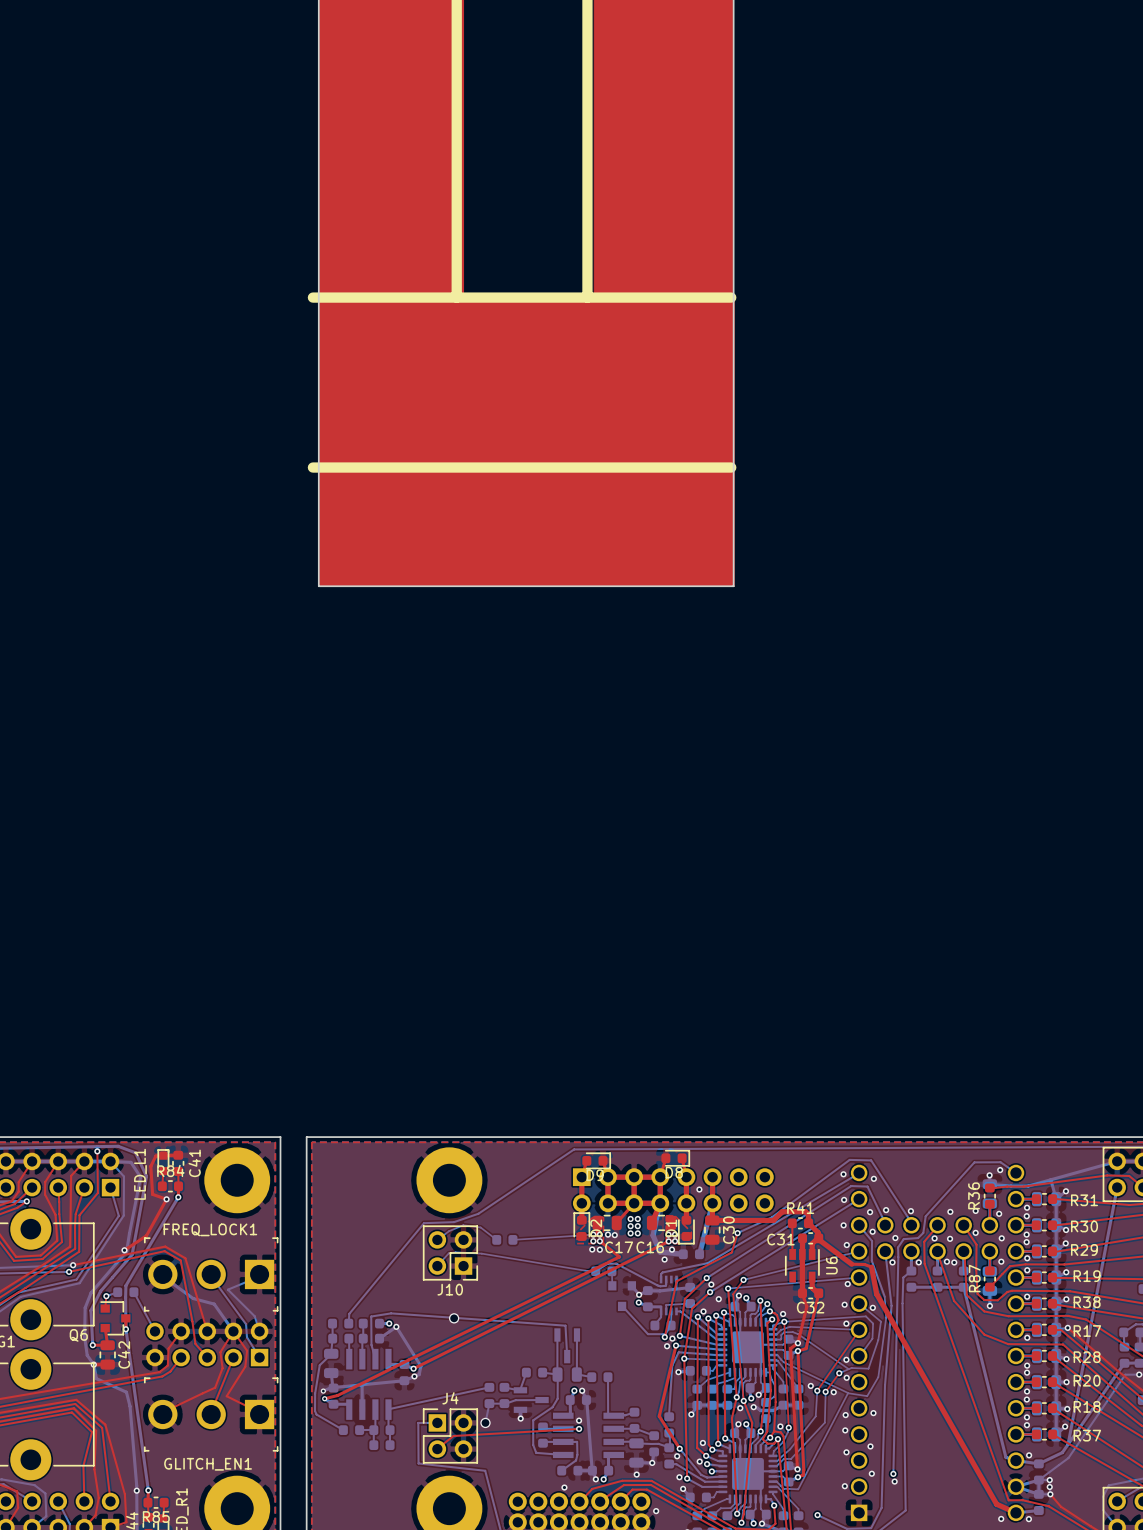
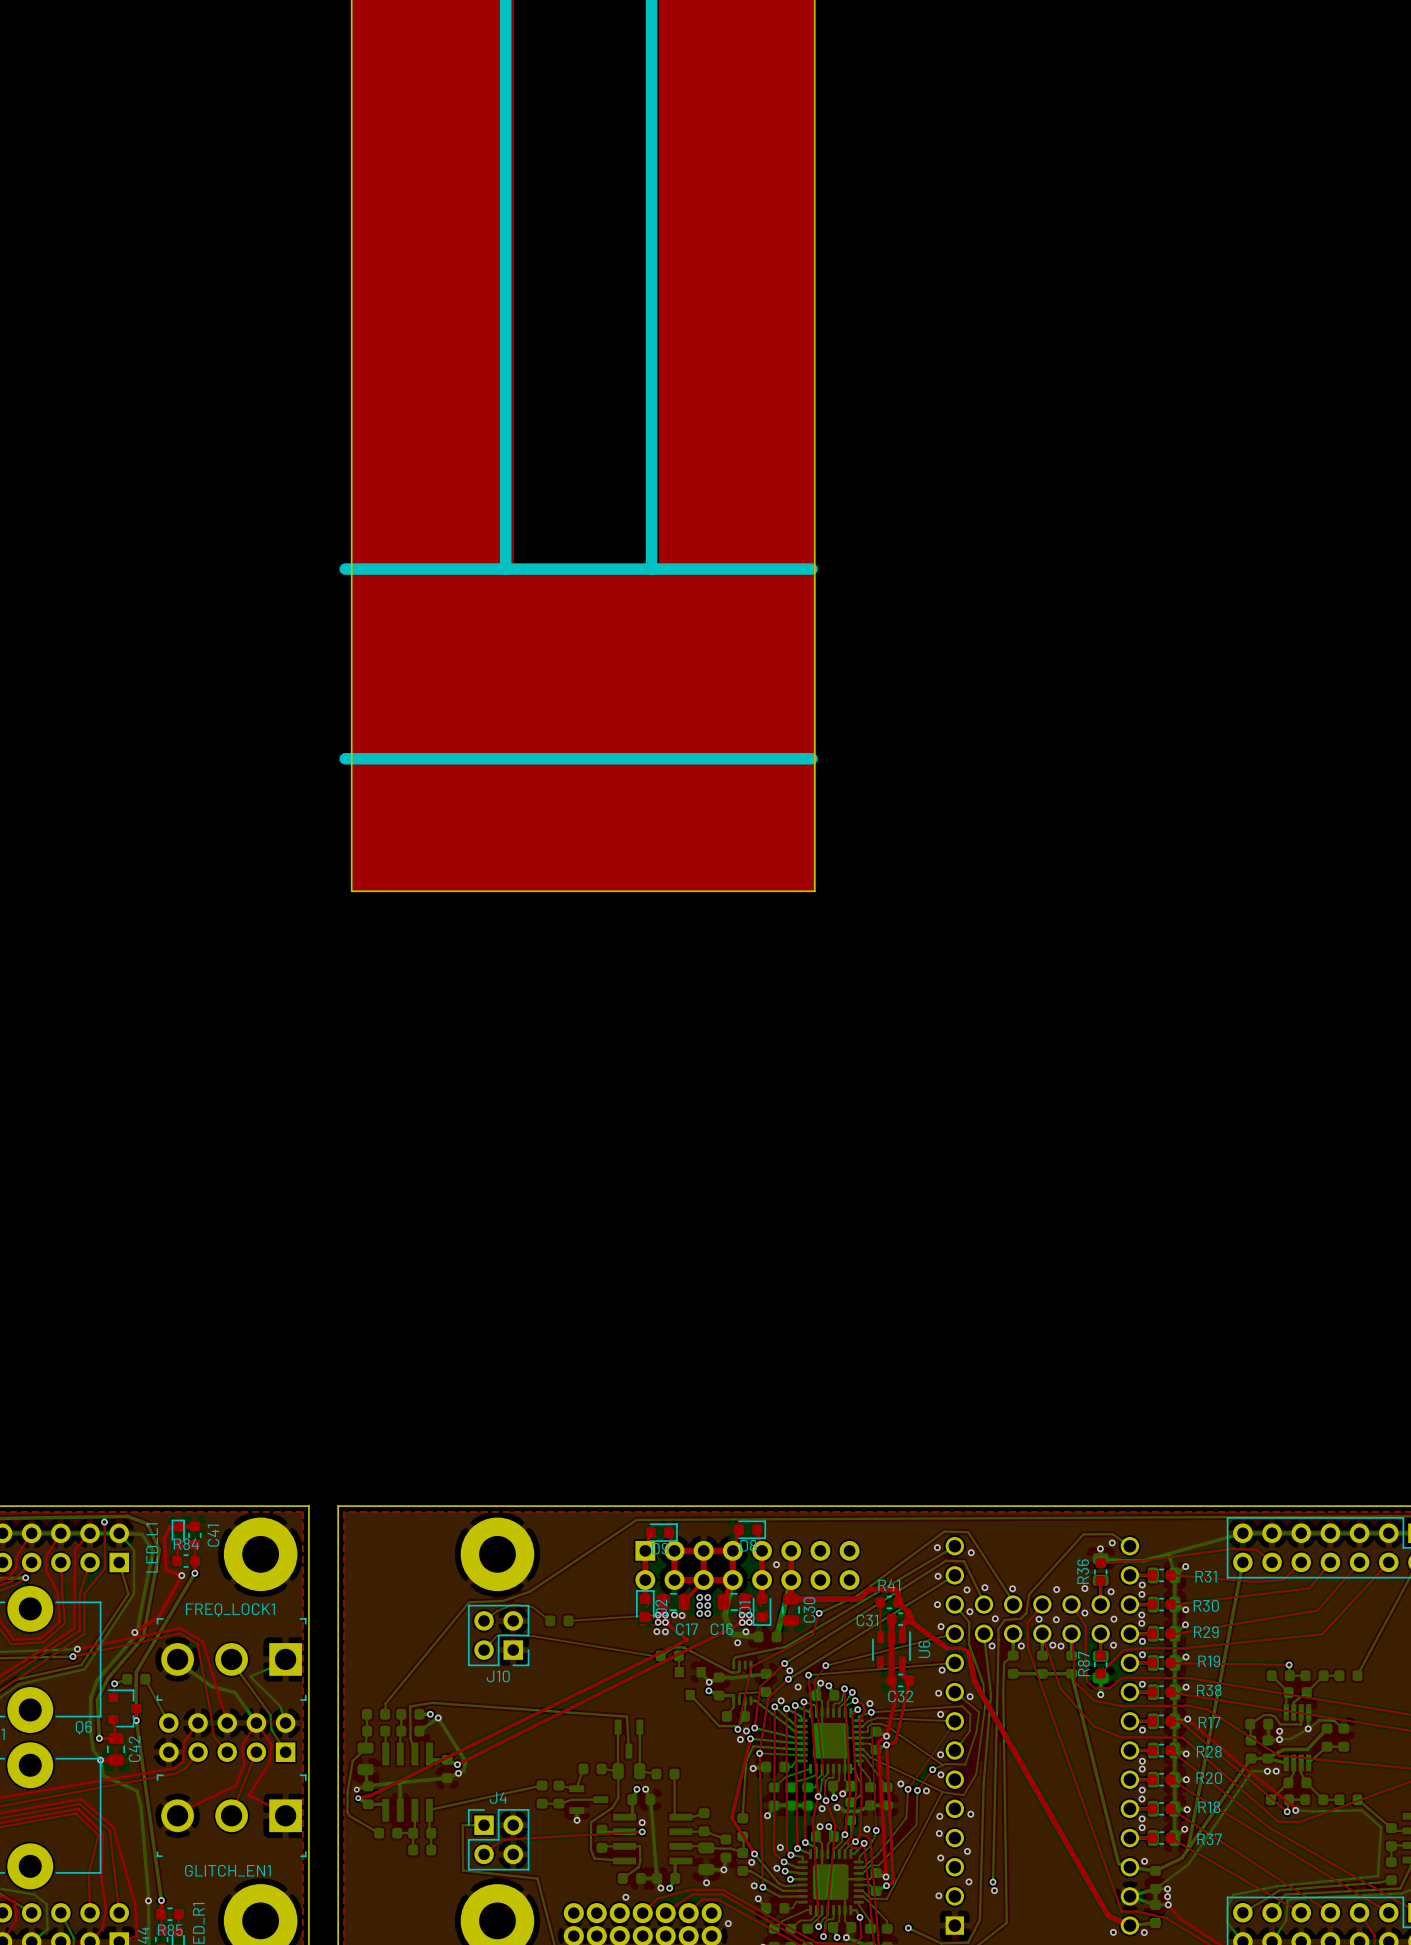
via: (454, 1318) -> none
bottom track: (489, 1403) (485, 1422) -> none
via: (485, 1422) -> none

